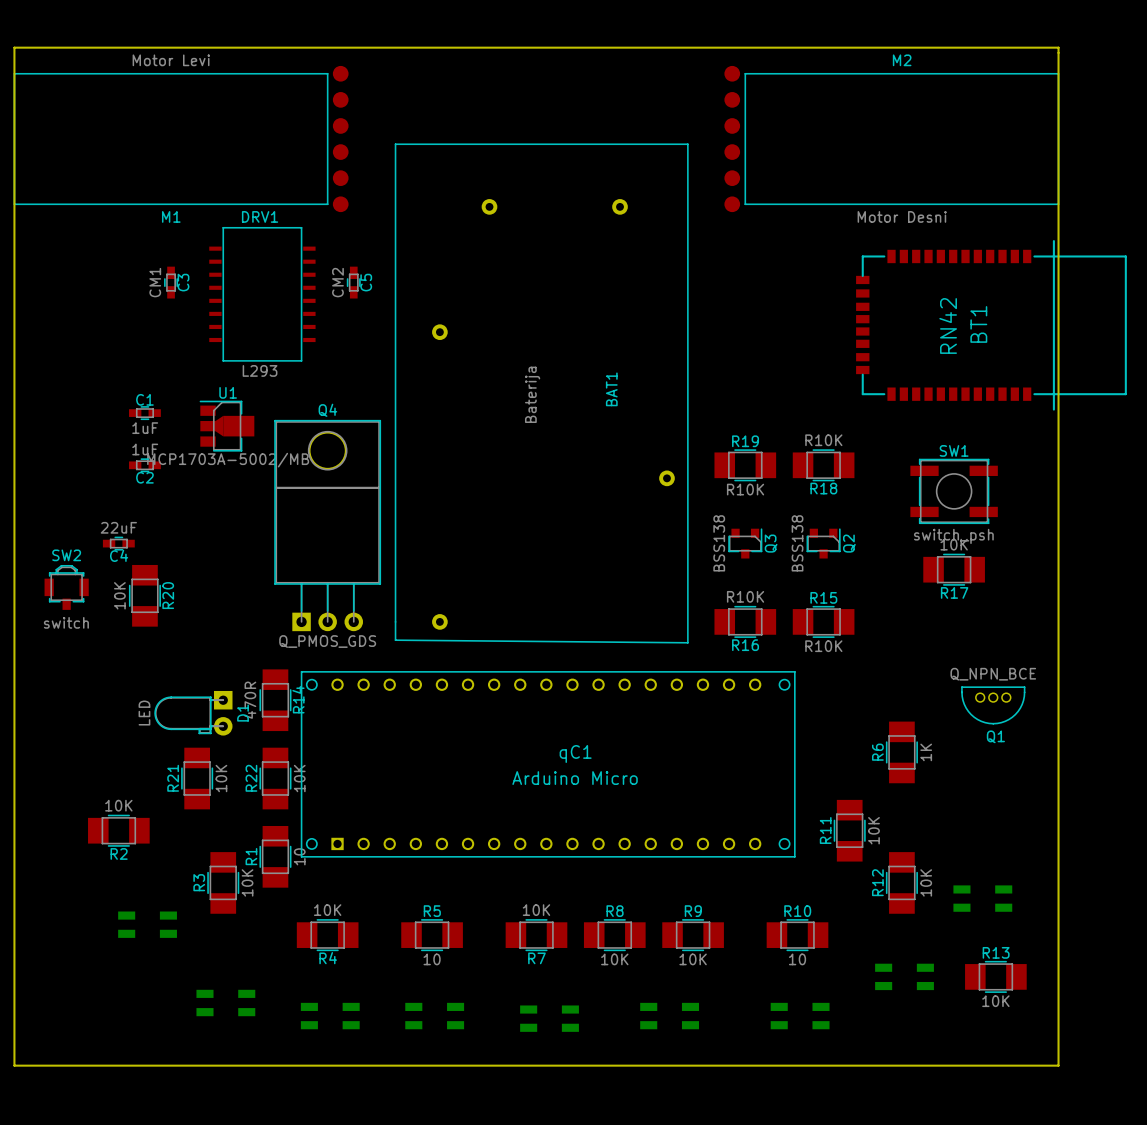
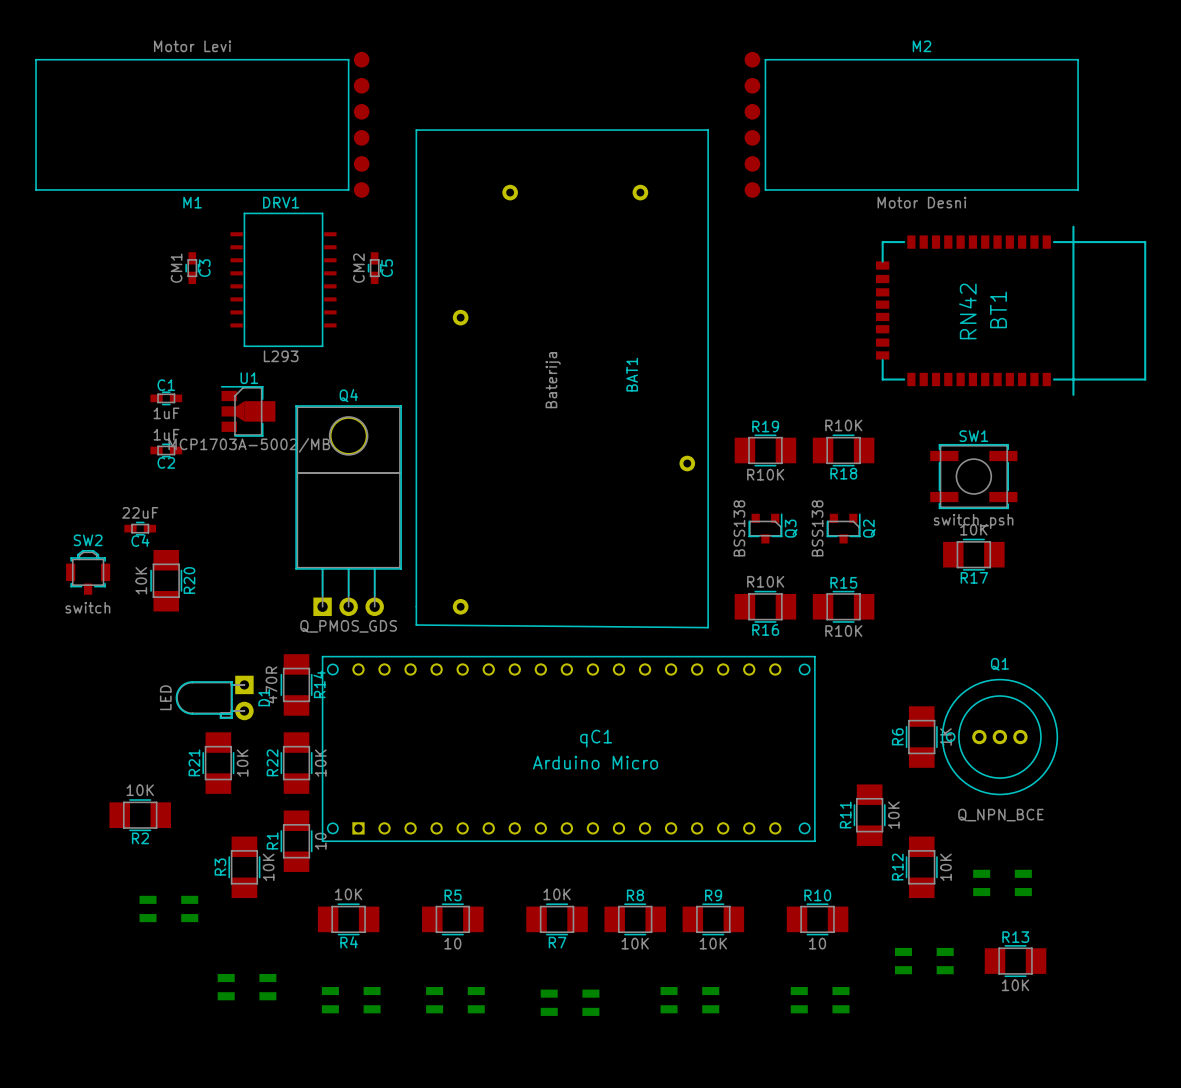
board edge: (14, 47) (14, 1065) (1058, 1065) (1058, 47) (14, 47) -> none
Q1 value position: Q_NPN_BCE (993, 674) -> Q_NPN_BCE (1000, 815)
Q1 footprint: [961, 686, 1026, 725] -> [941, 678, 1059, 796]
Q1 name position: Q1 (995, 736) -> Q1 (999, 664)

